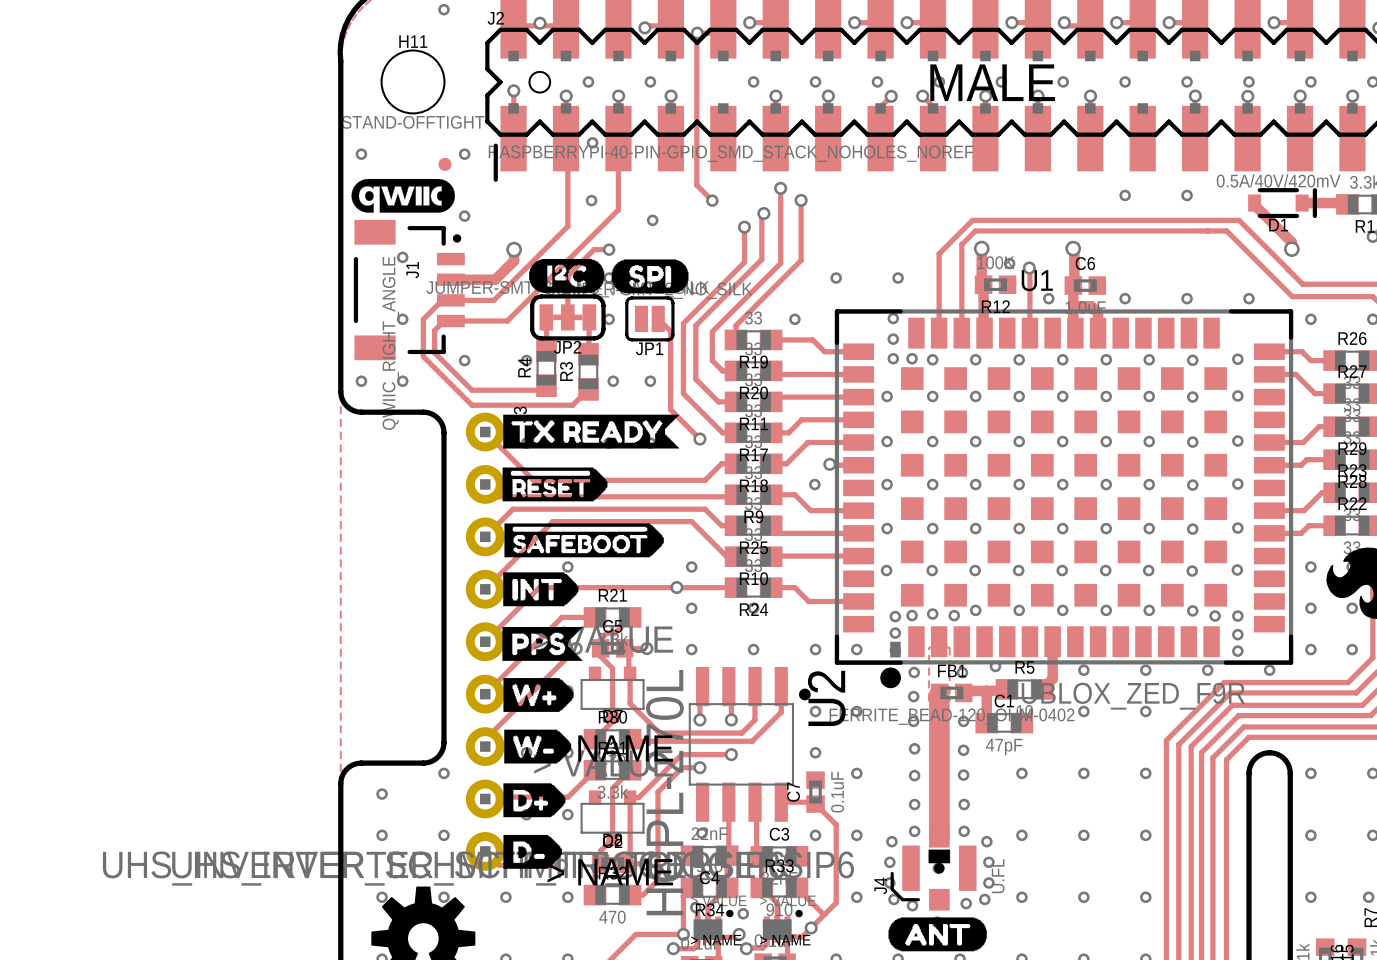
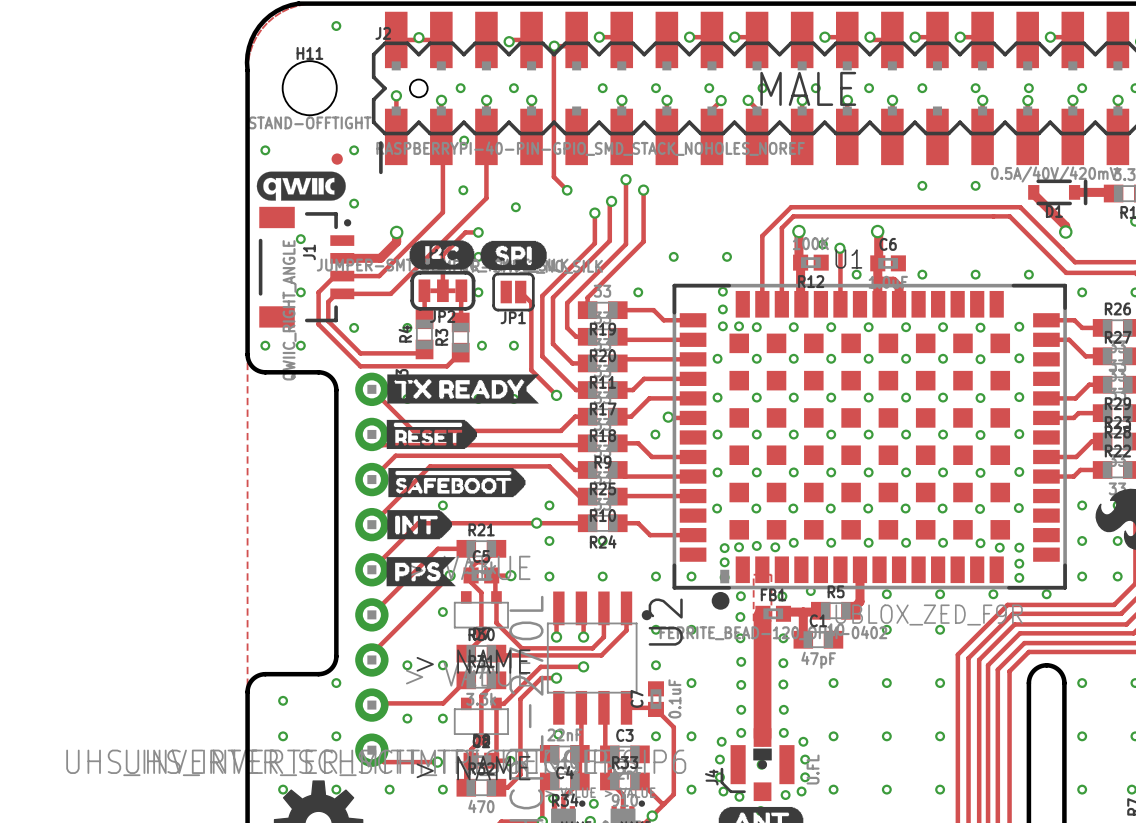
drawing: [503, 678, 574, 869] -> none

